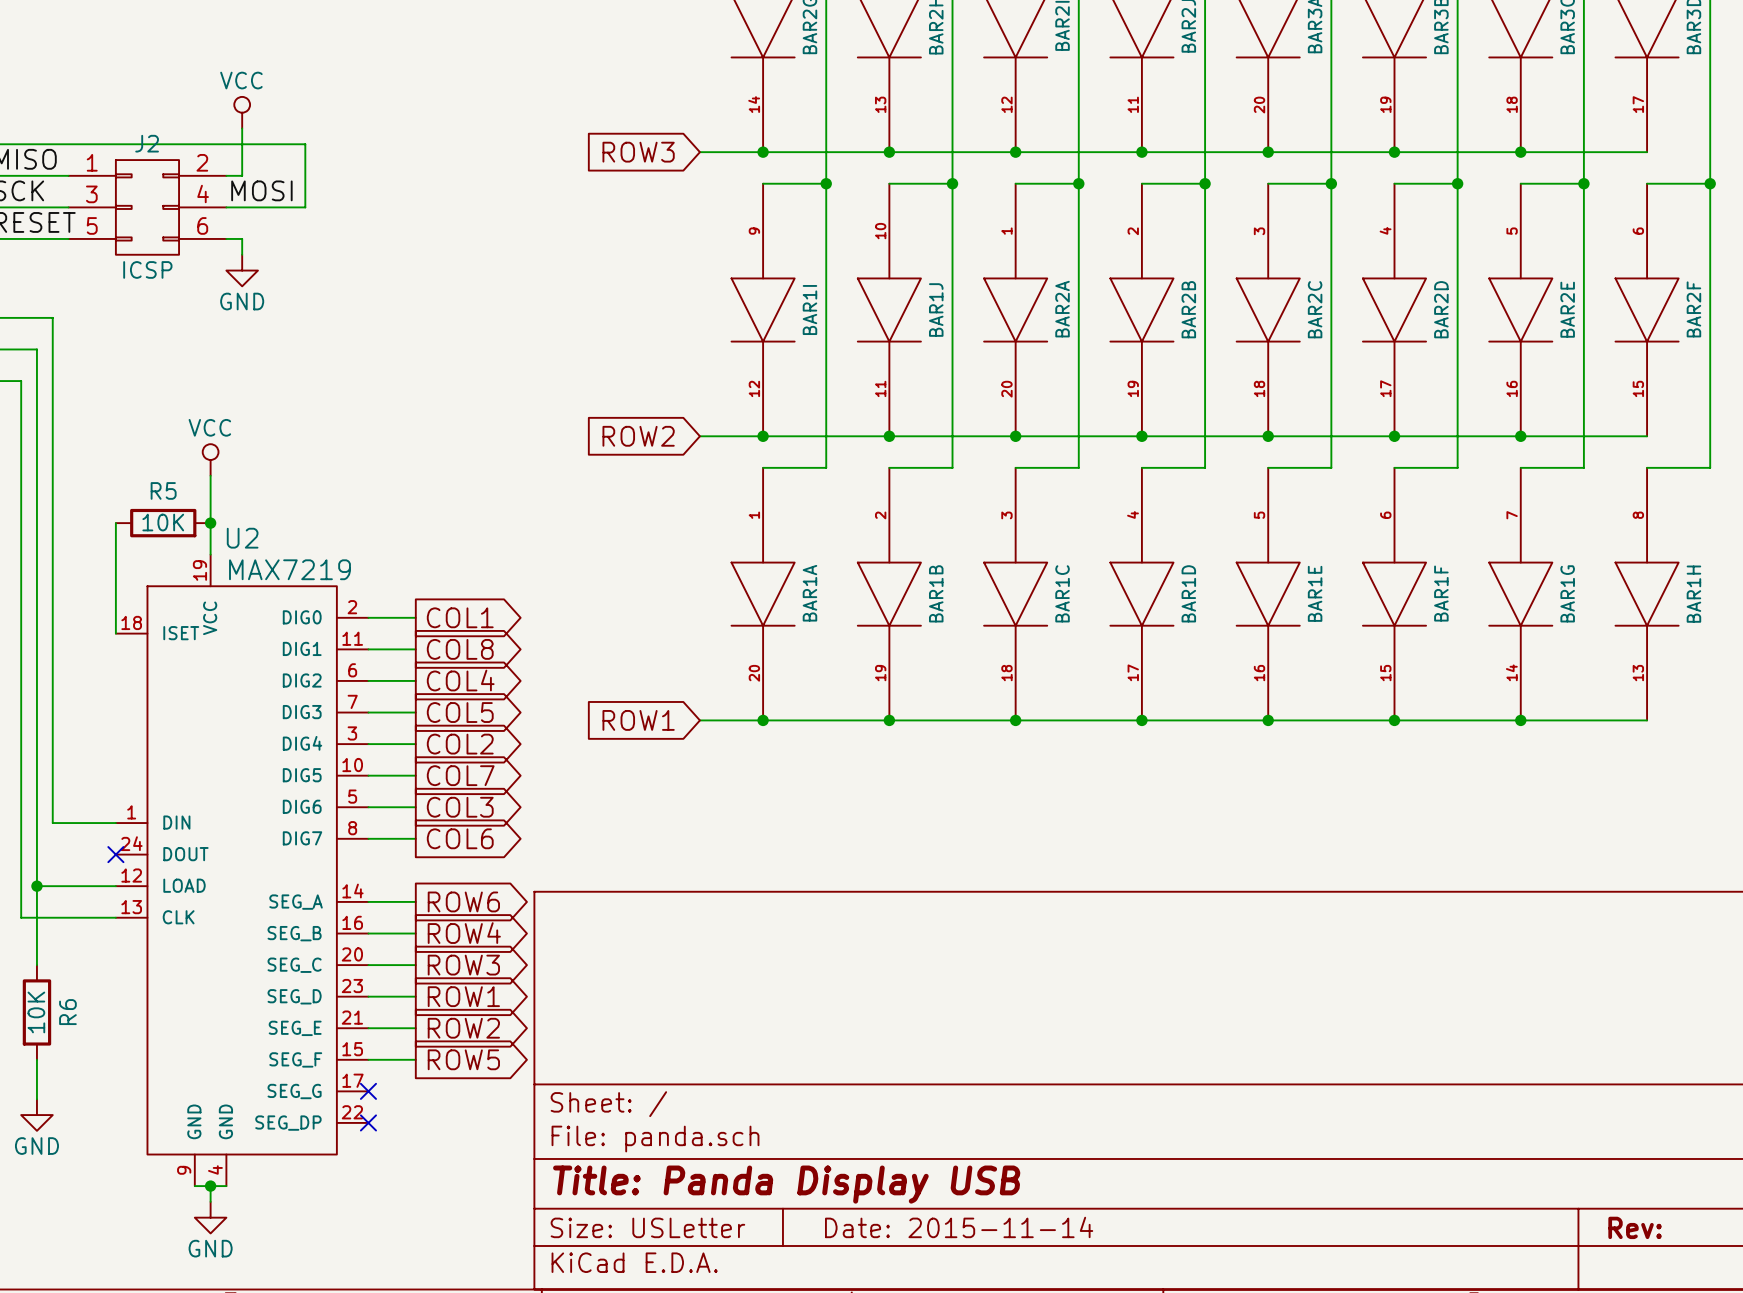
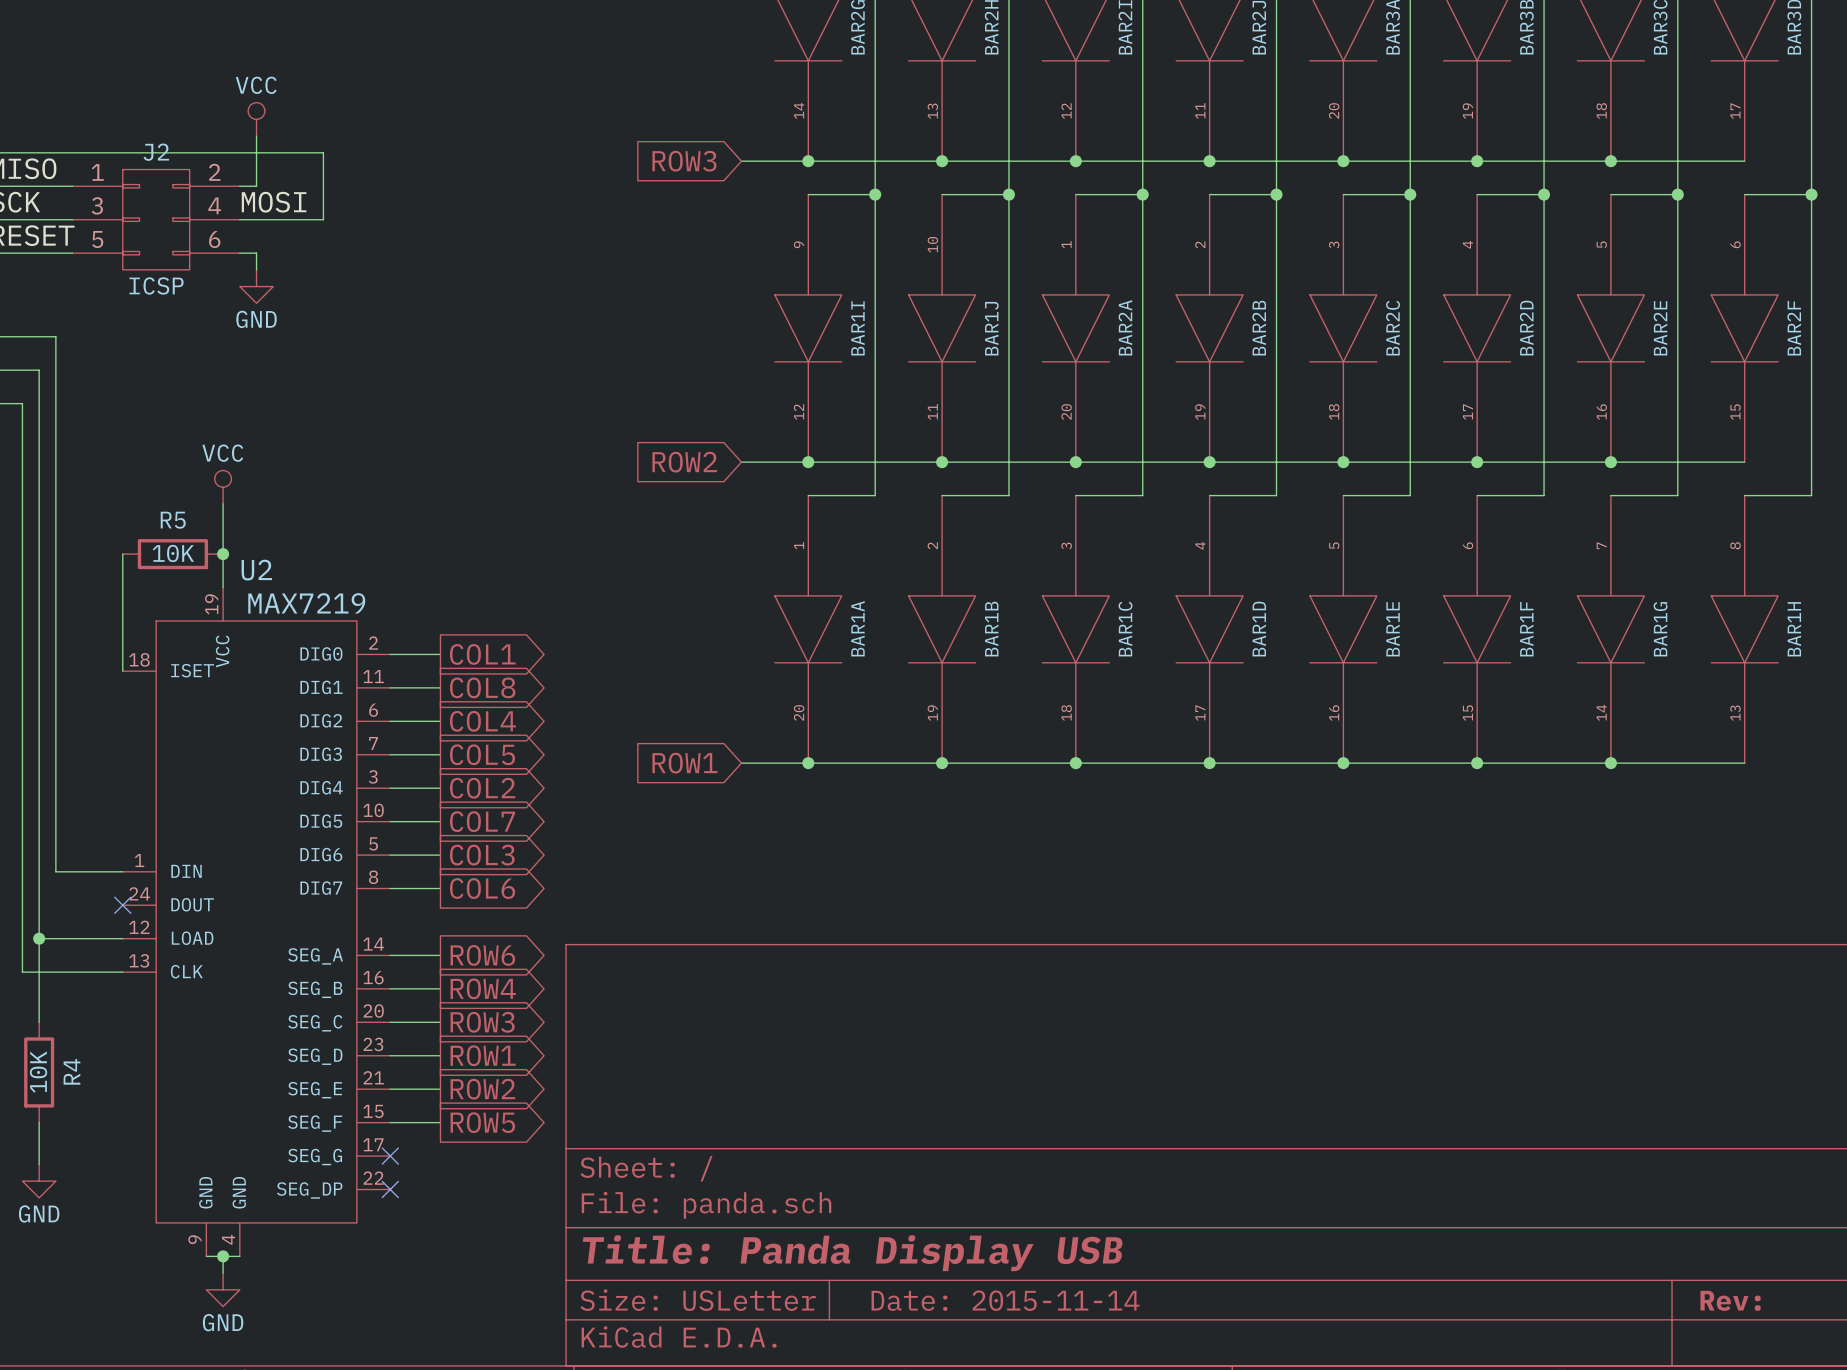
R6 name: R6 (67, 1012) -> R4 (71, 1071)

